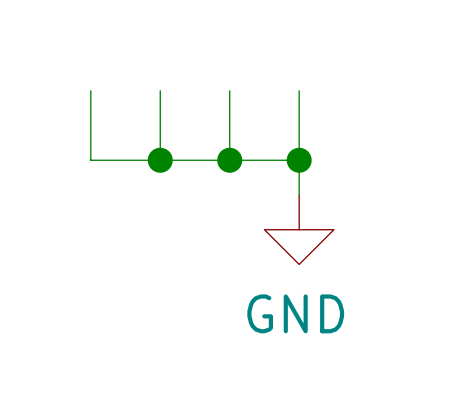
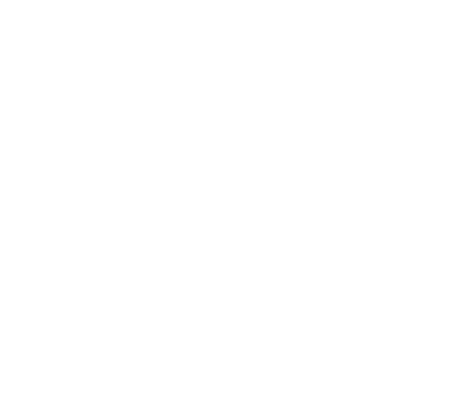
wire: (90, 90) (90, 160) (299, 160) -> none
wire: (160, 90) (160, 160) -> none
wire: (229, 90) (229, 160) -> none
wire: (299, 90) (299, 194) -> none
junction: (160, 160) -> none
junction: (229, 160) -> none
junction: (299, 160) -> none
power symbol: GND (299, 229) -> none

